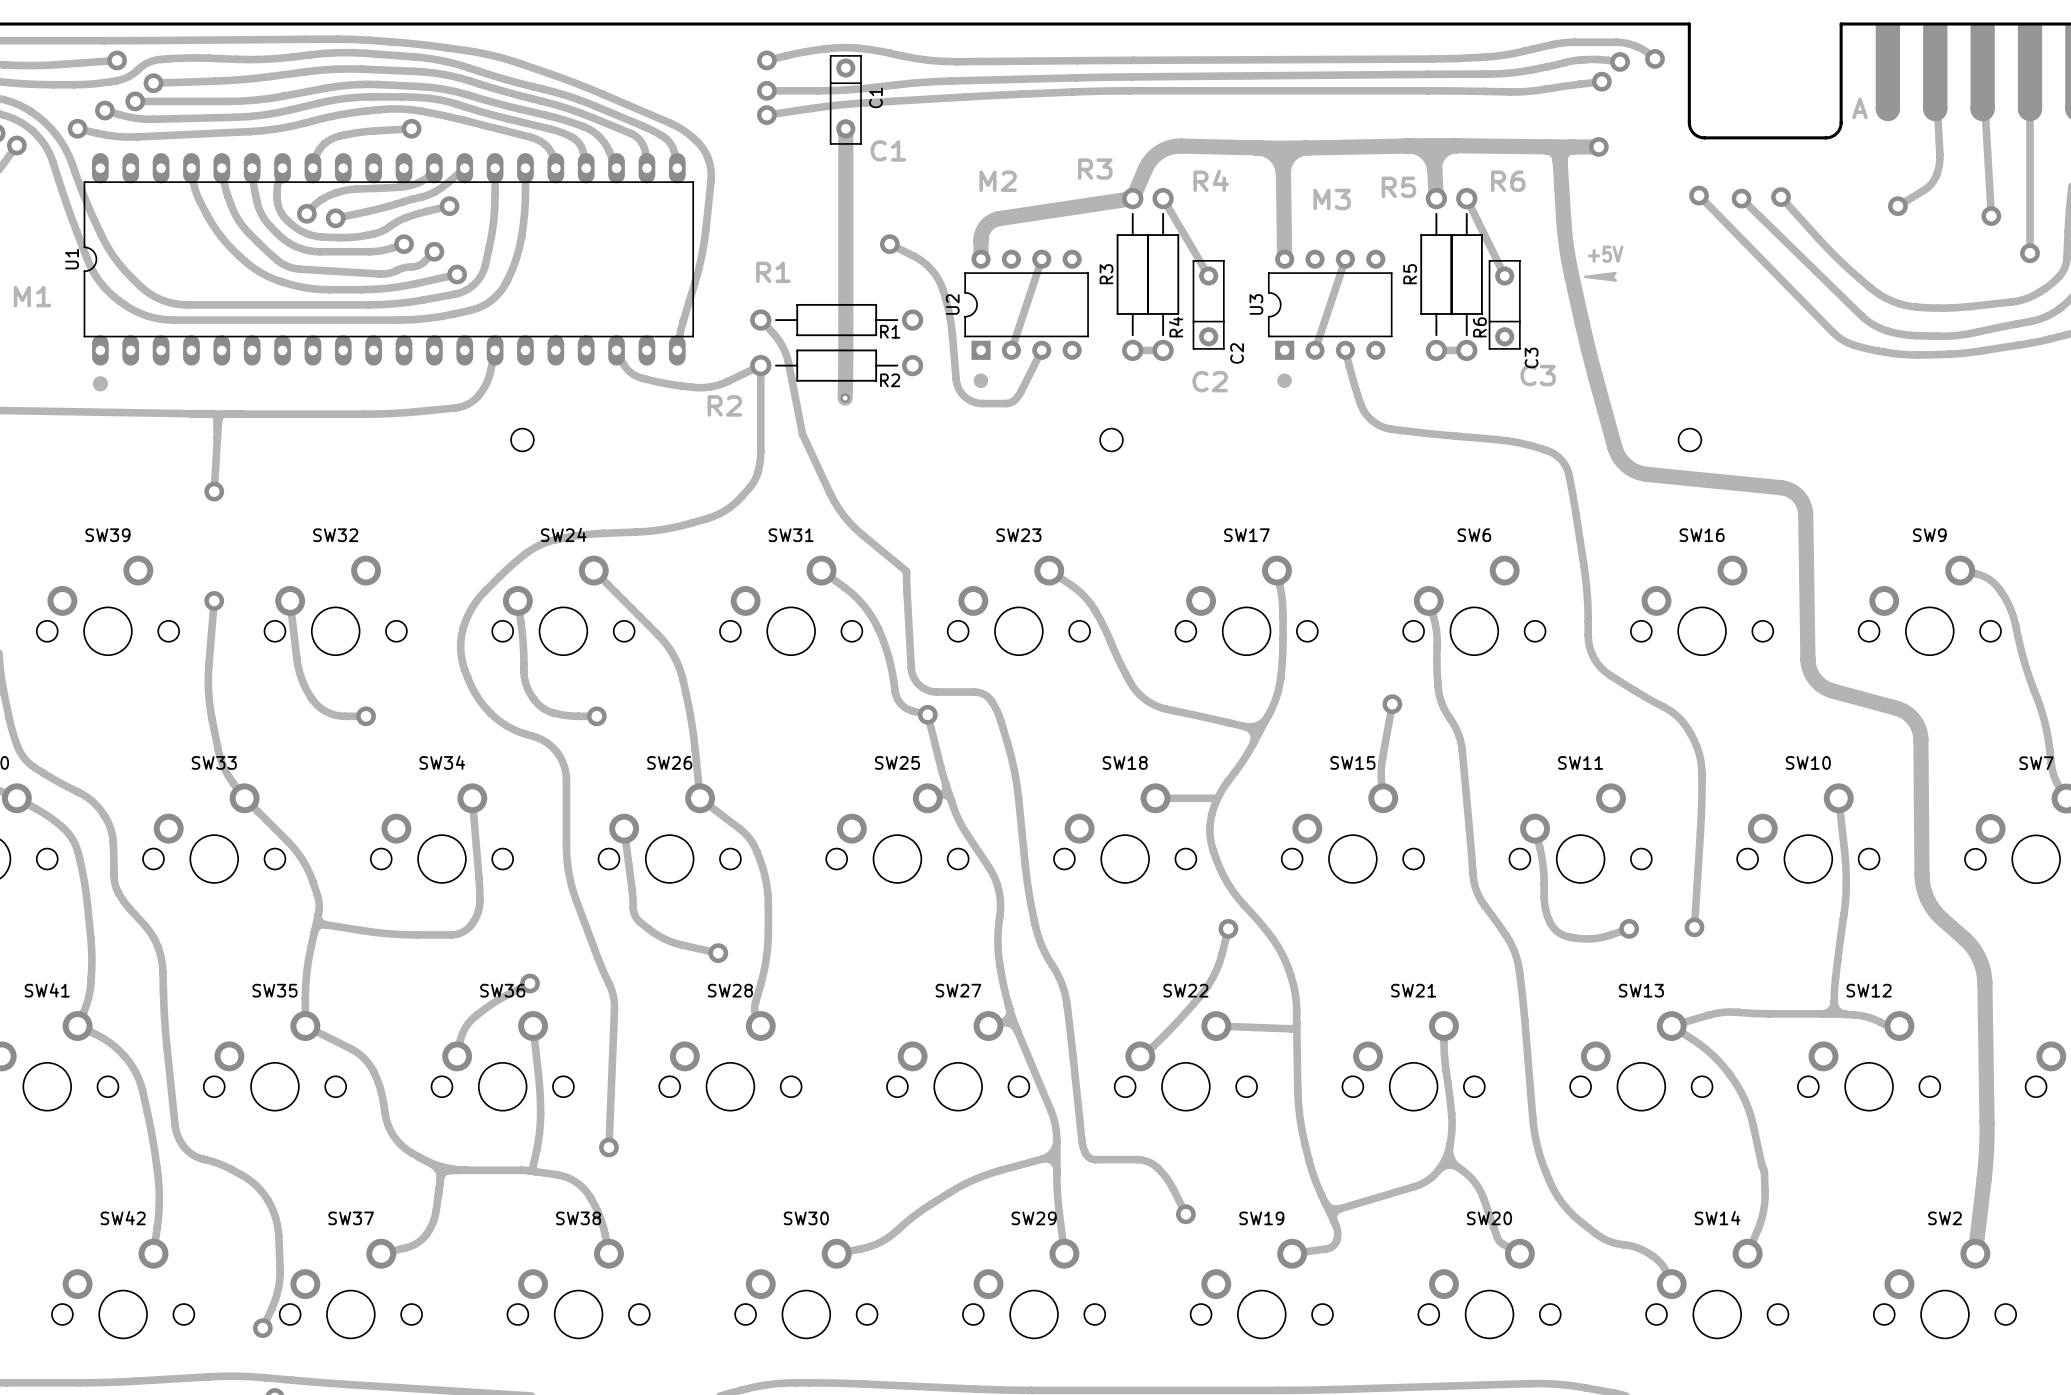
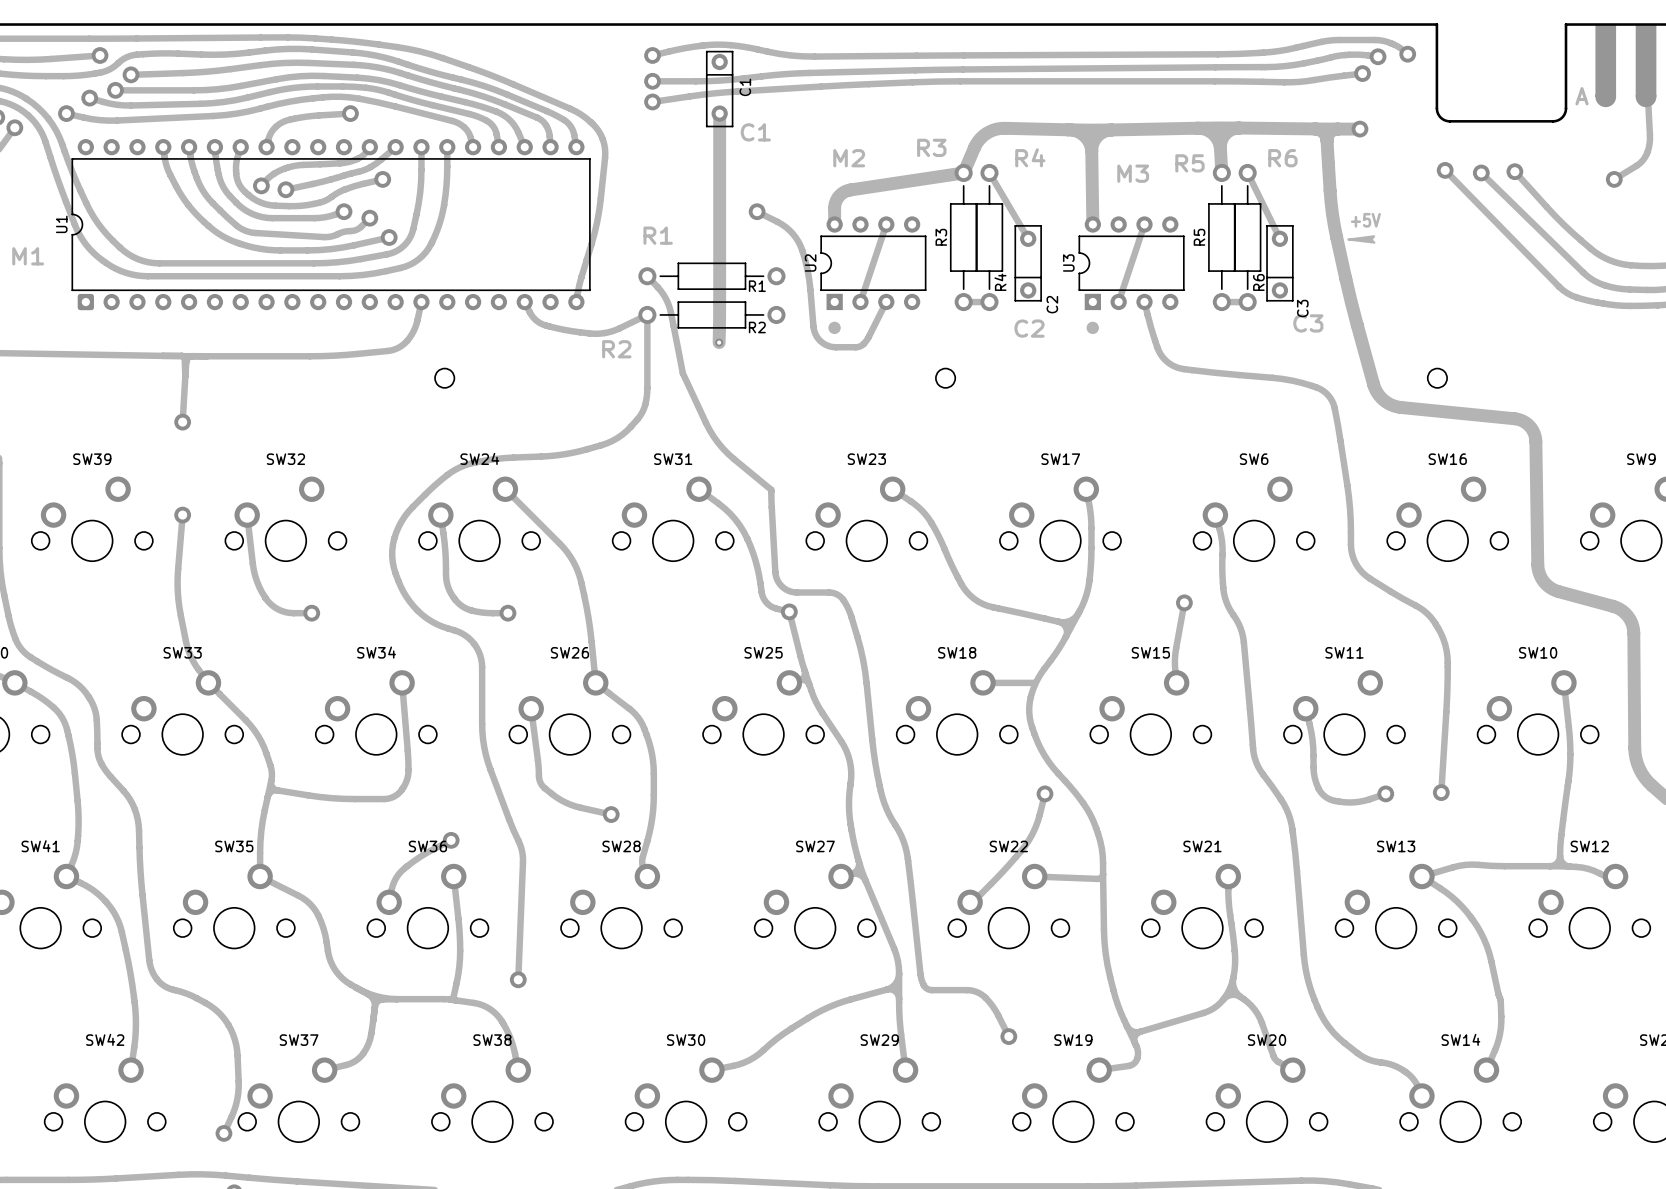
U1 footprint: [83, 153, 694, 392] -> [71, 139, 591, 311]

